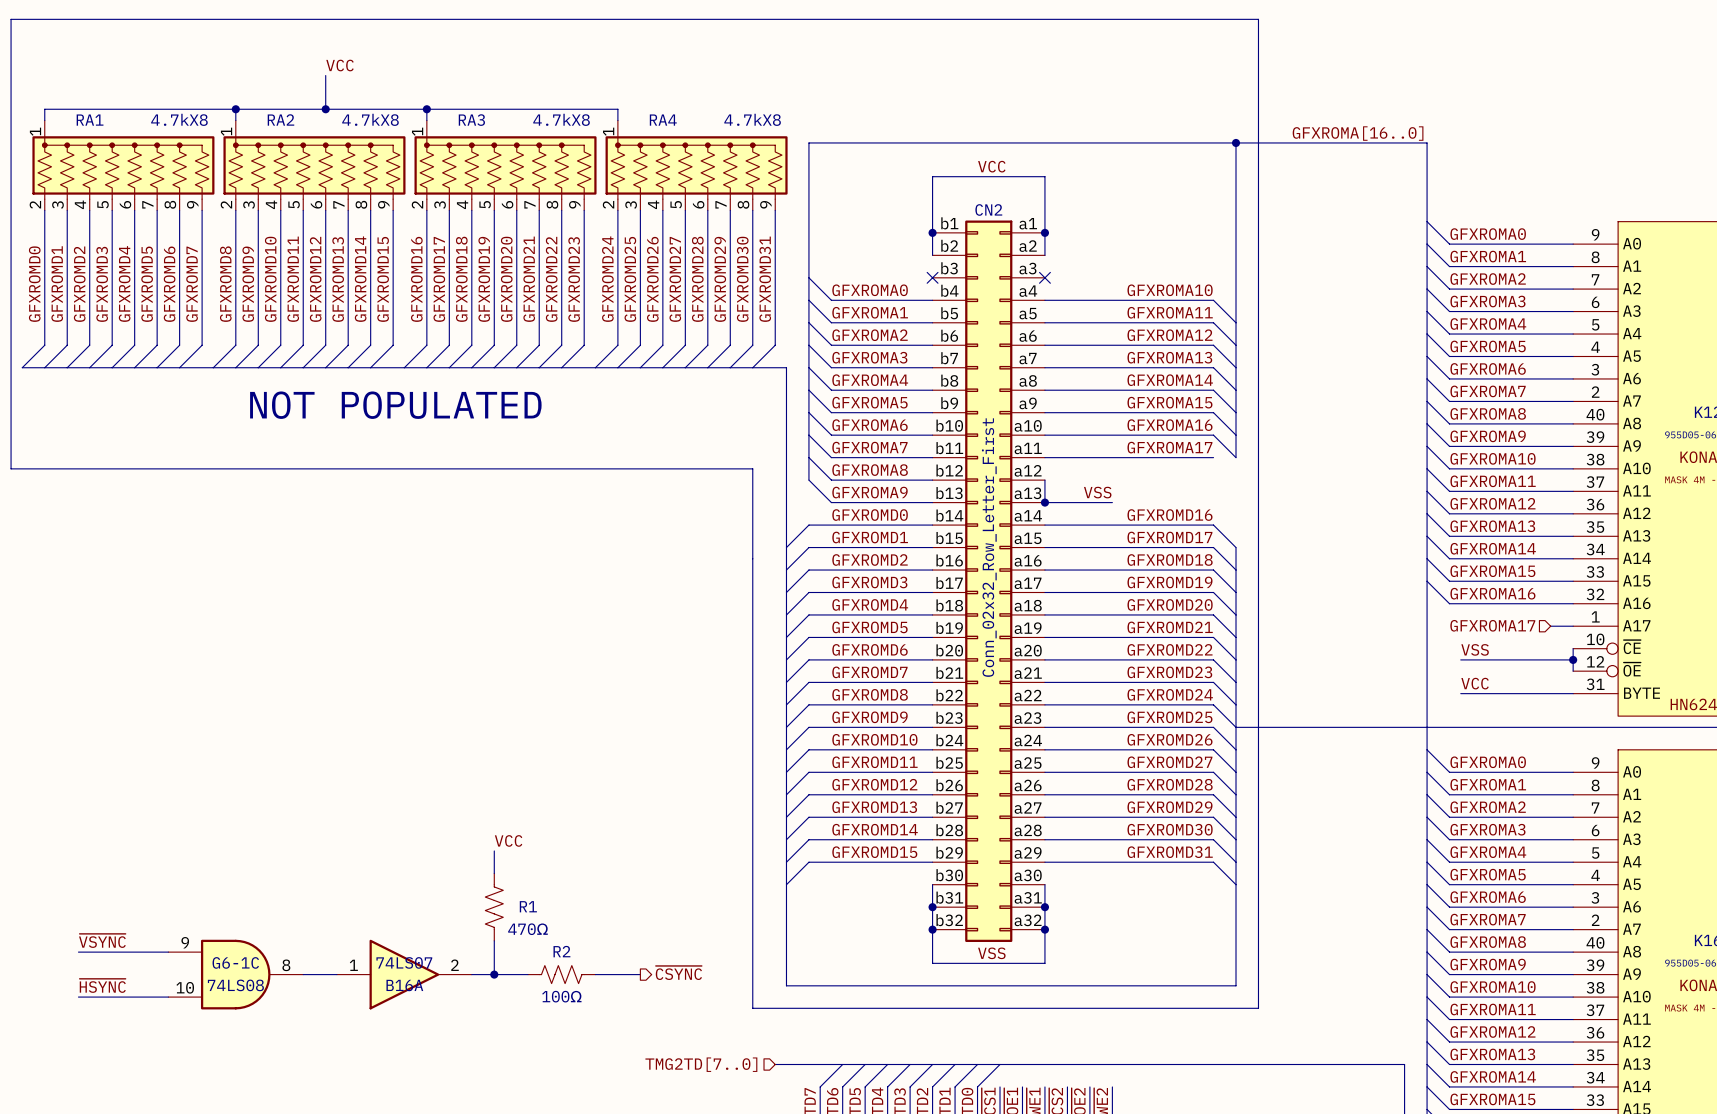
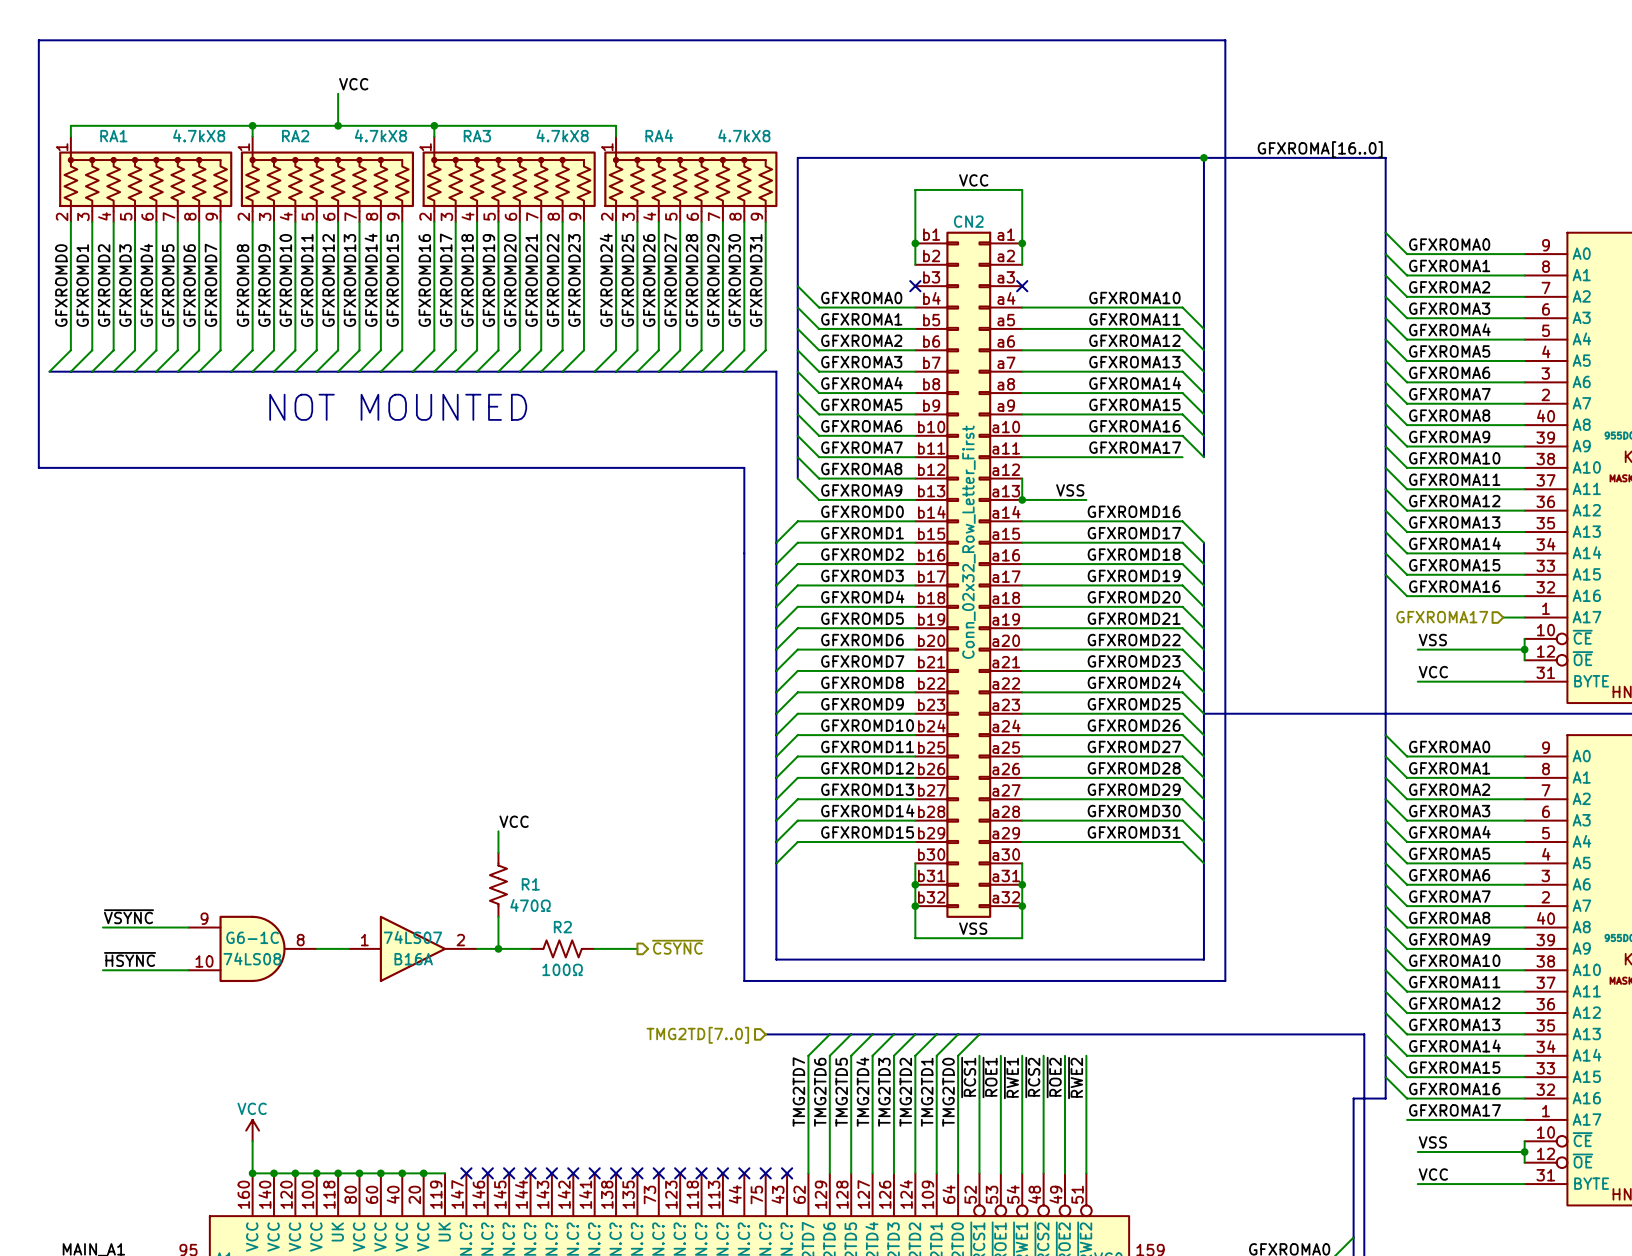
text: NOT POPULATED (395, 405) -> NOT MOUNTED (398, 407)

